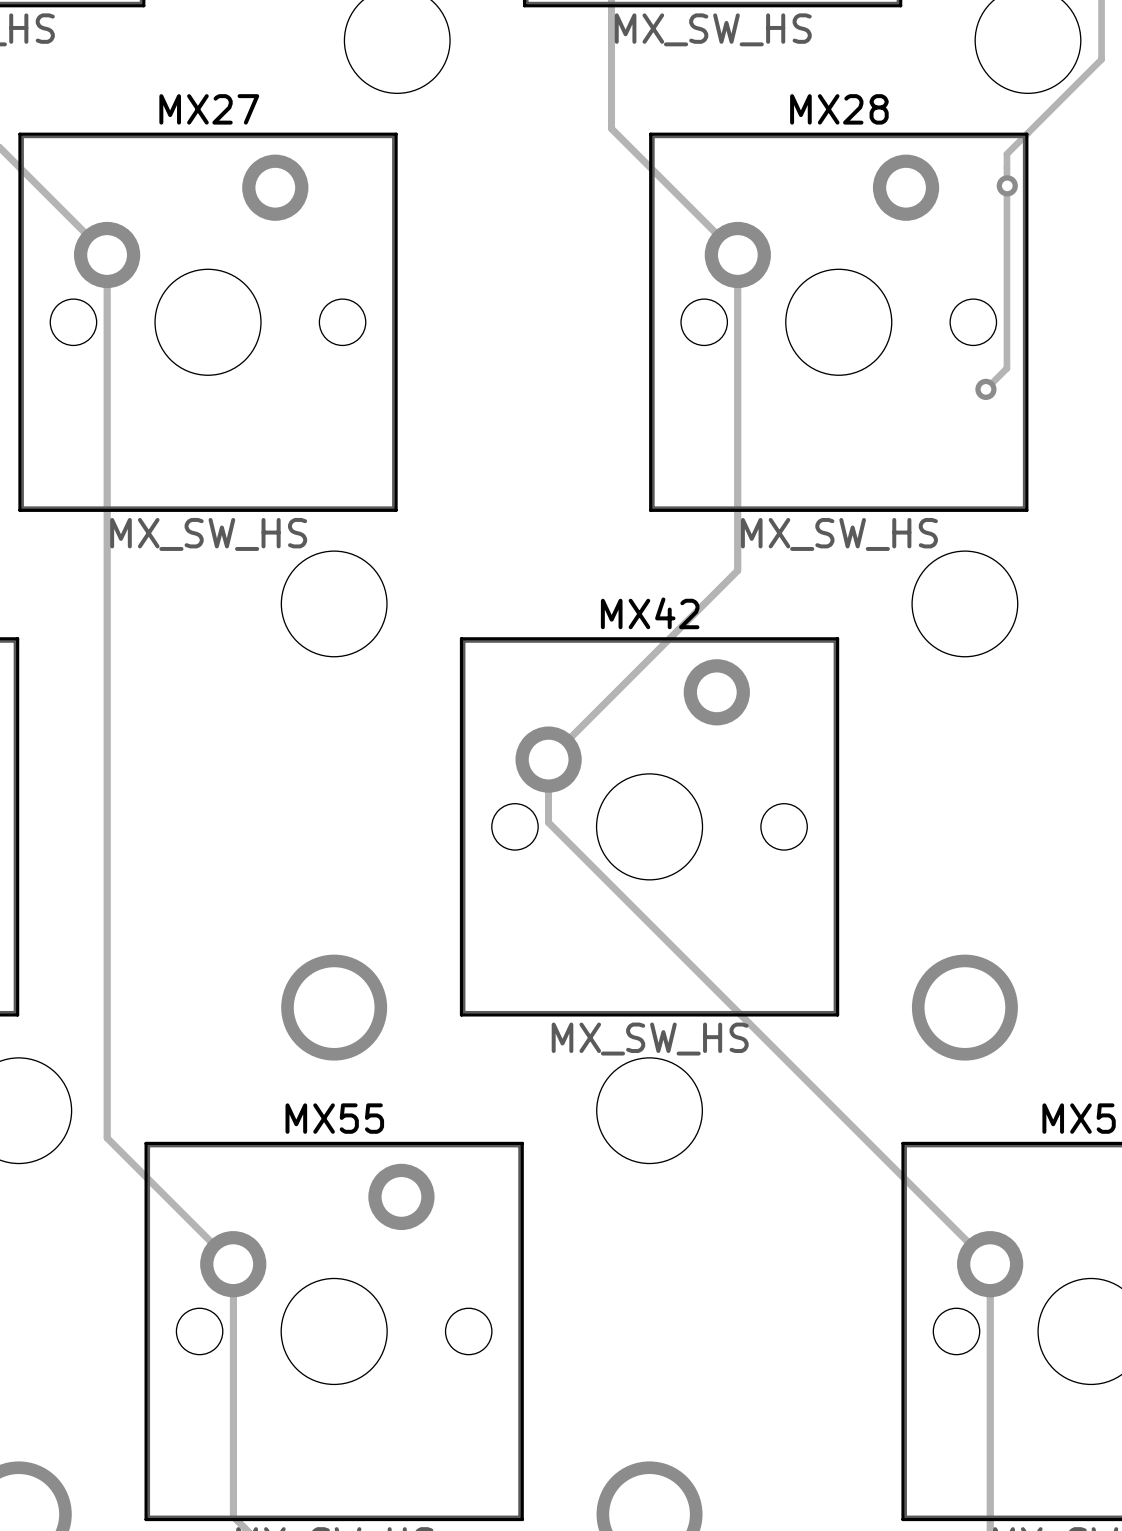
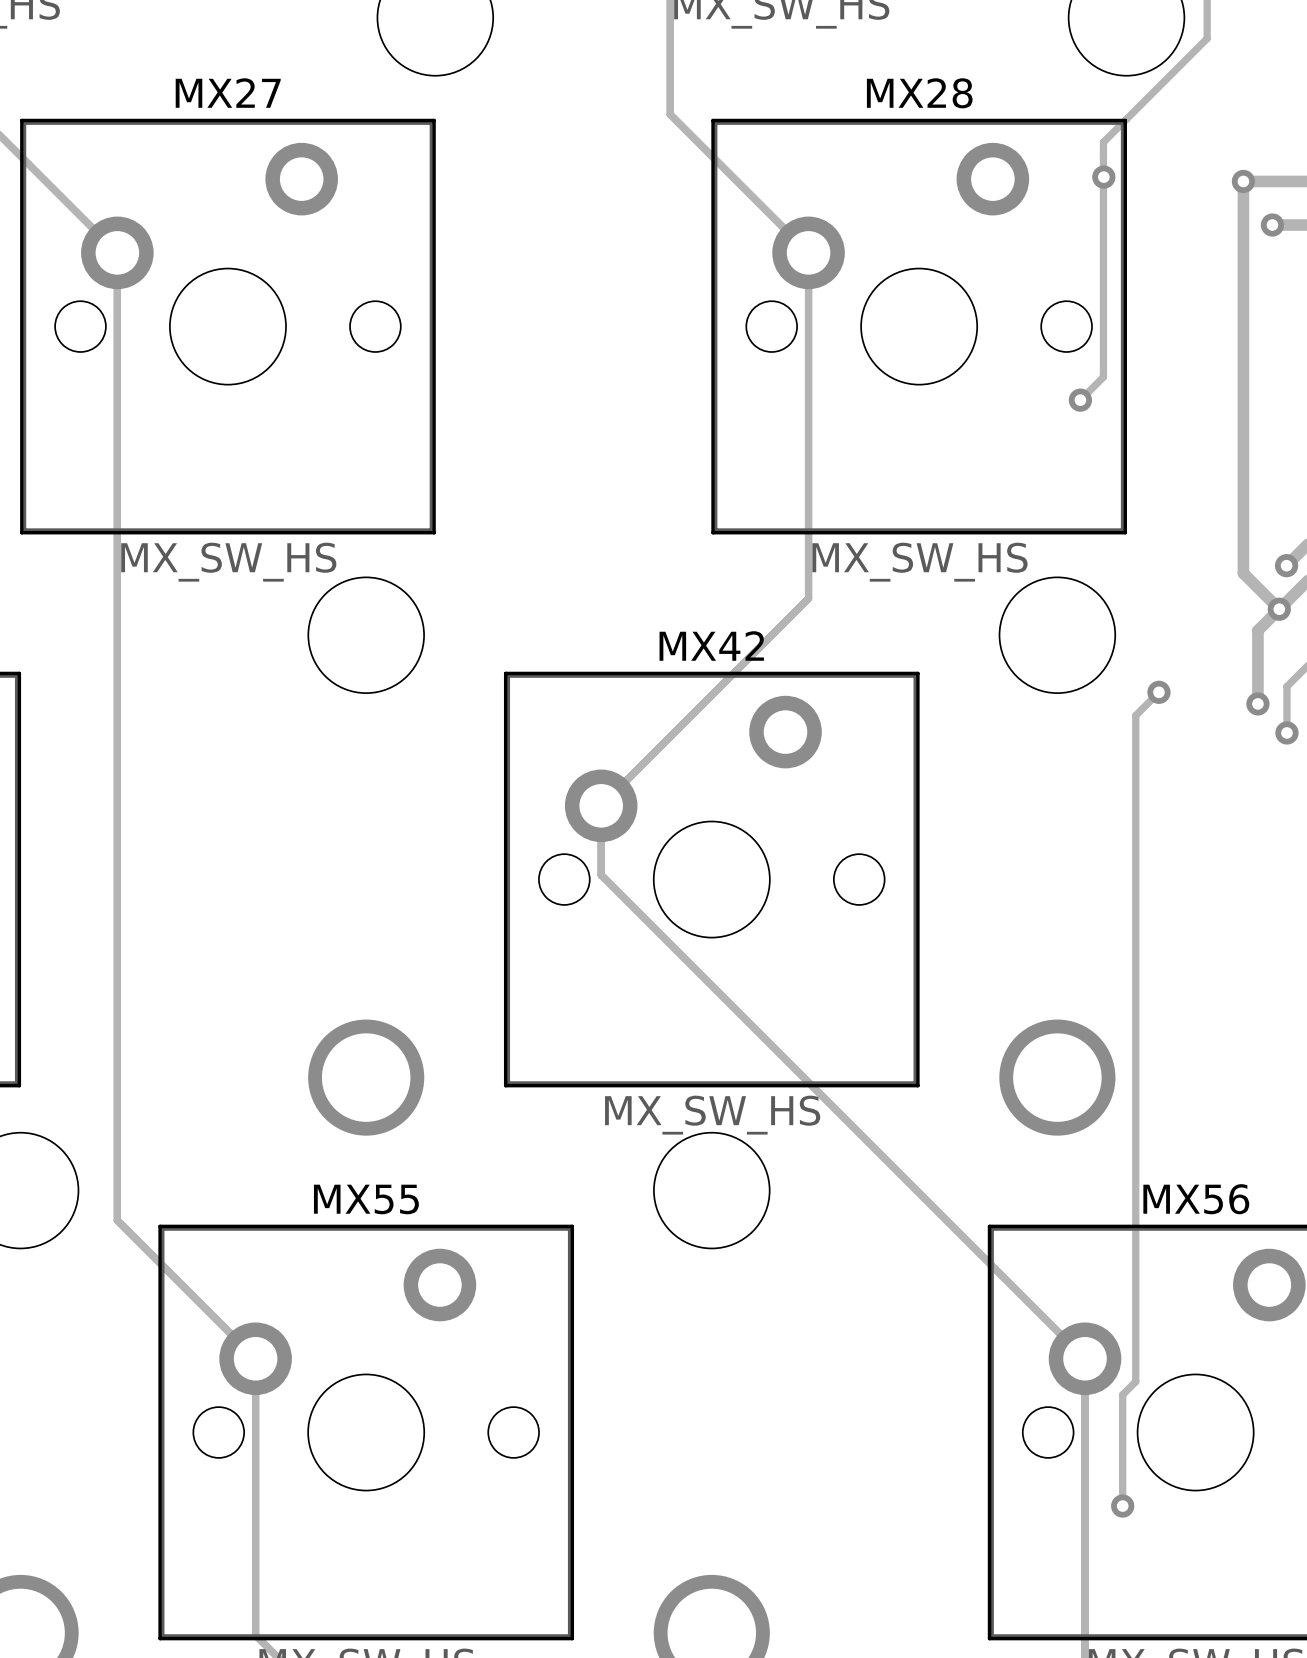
track: none -> (1158, 692) (1135, 715) (1135, 1381) (1122, 1394) (1122, 1506)
via: none -> (1158, 692)
via: none -> (1122, 1506)

